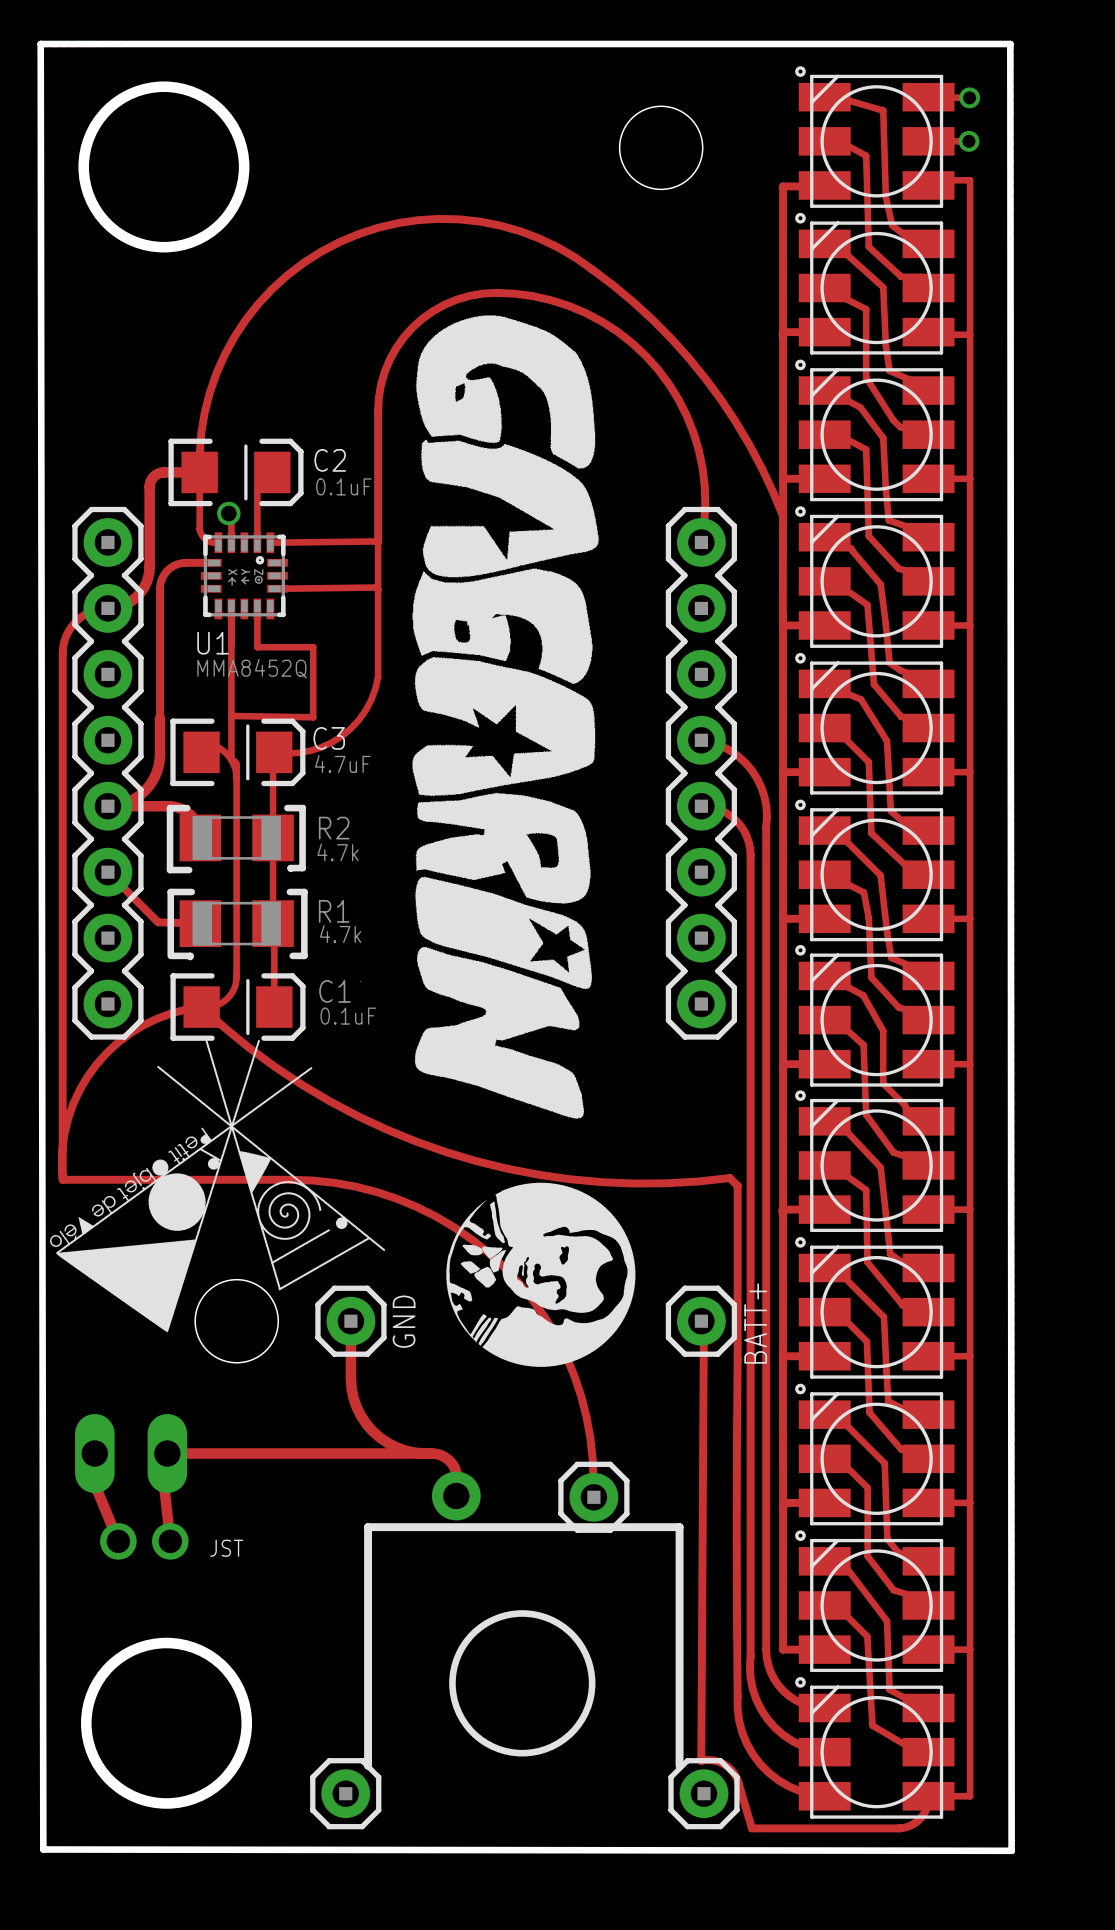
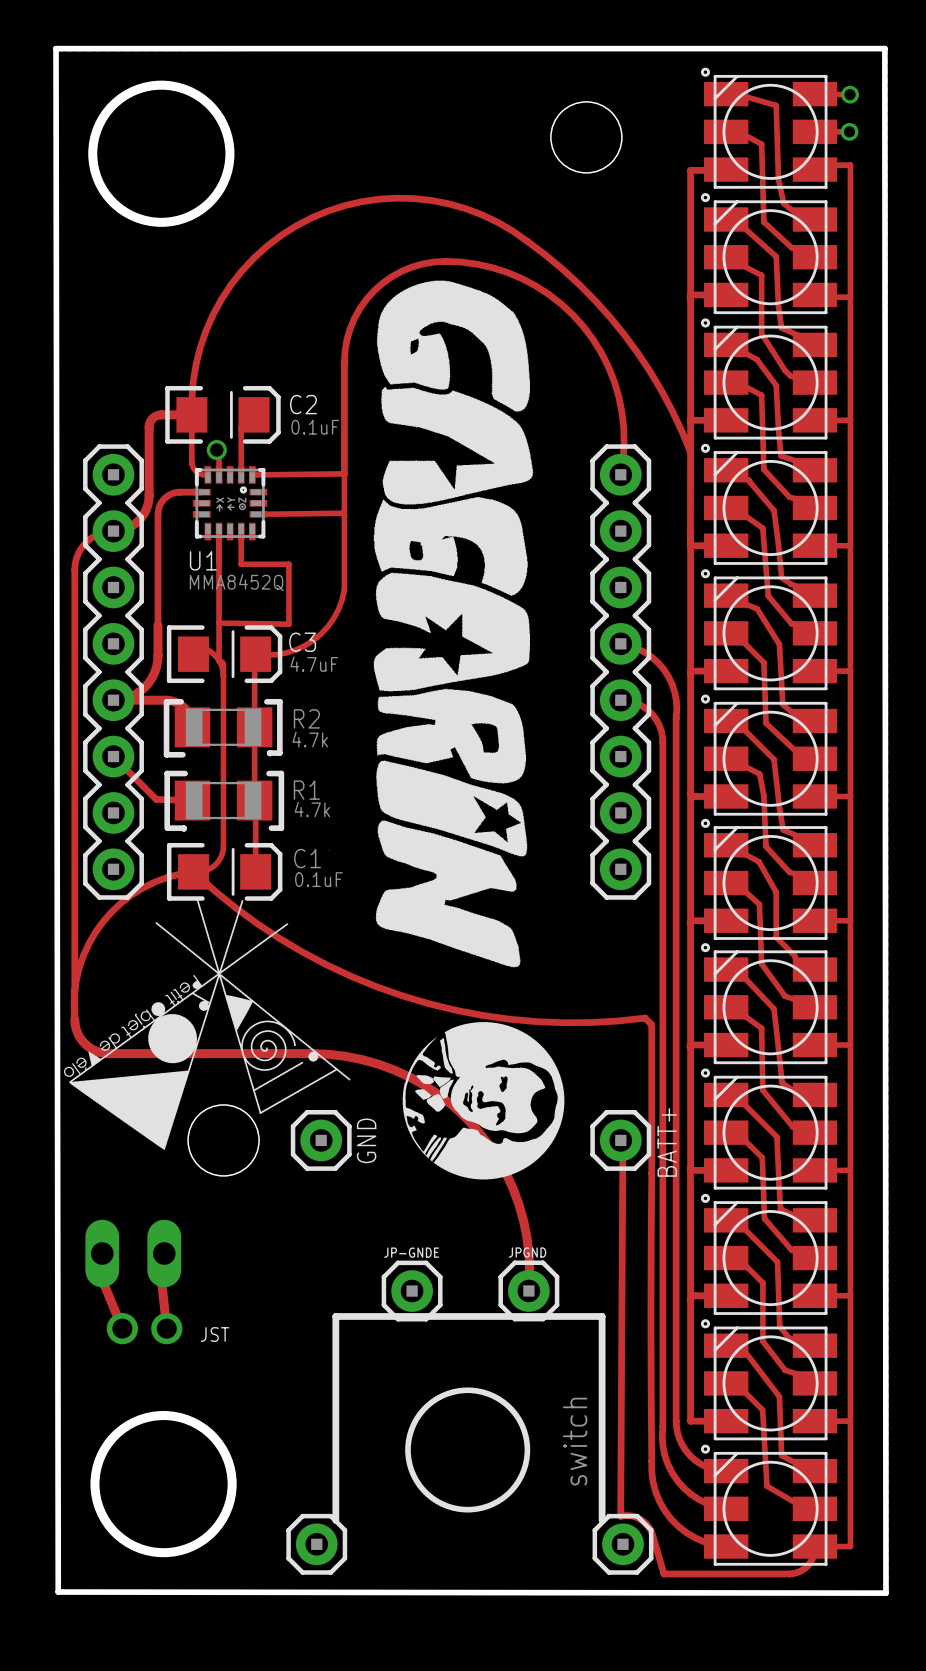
track: (62, 1179) (313, 1180) (334, 1182) (376, 1192) (416, 1207) (436, 1216) (472, 1240) (505, 1268) (533, 1300) (556, 1337) (574, 1376) (586, 1417) (590, 1438) (593, 1481) -> (74, 1019) (75, 1028) (81, 1040) (91, 1049) (104, 1053) (328, 1054) (378, 1064) (425, 1085) (465, 1117) (487, 1143) (505, 1172) (523, 1221) (529, 1255) (529, 1291)
track: (350, 1321) (351, 1388) (361, 1415) (372, 1431) (388, 1443) (406, 1450) (426, 1453) -> none
JPGND name: none -> JPGND (527, 1252)
track: (167, 1453) (434, 1453) (444, 1456) (451, 1463) (457, 1479) -> none
JP-GNDE side: bottom (456, 1496) -> top (412, 1291)
JPGND value: none -> switch (575, 1441)

